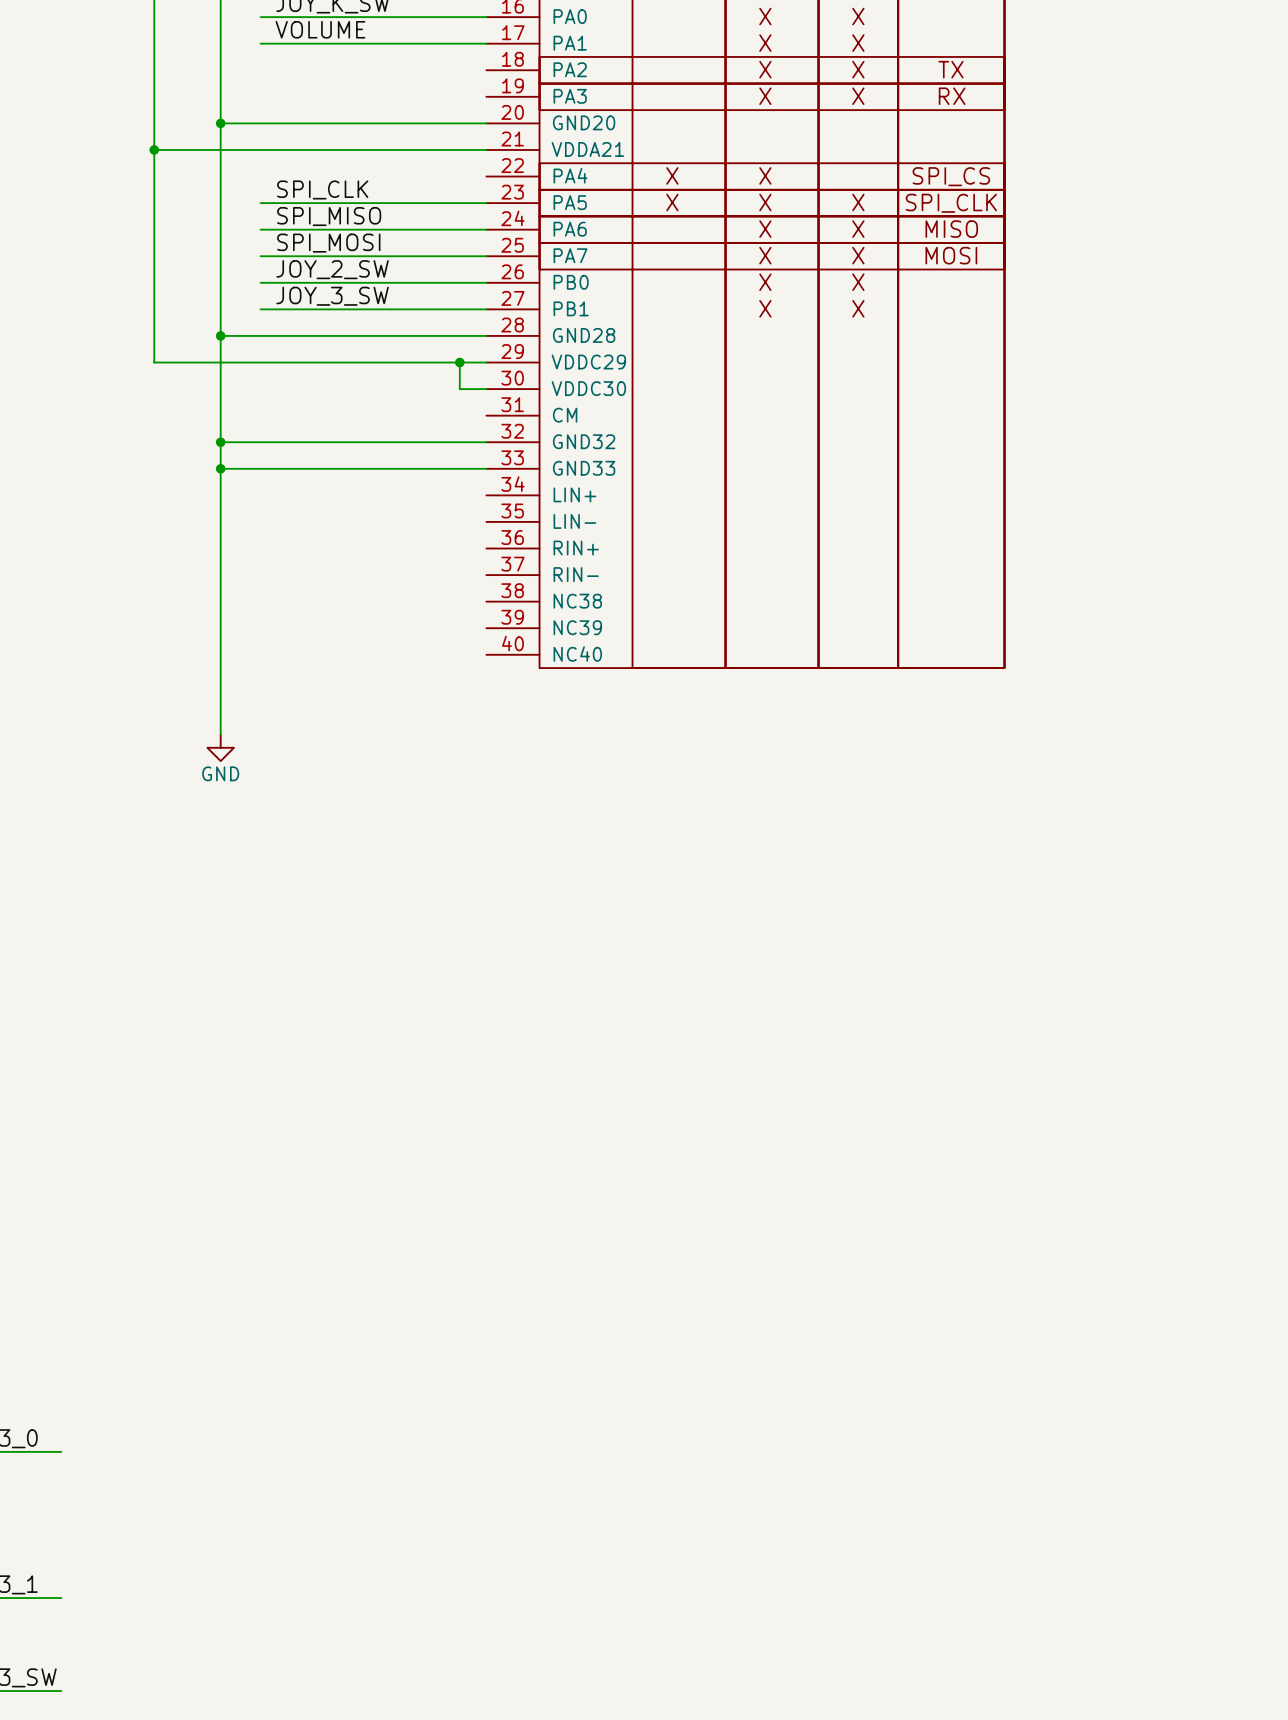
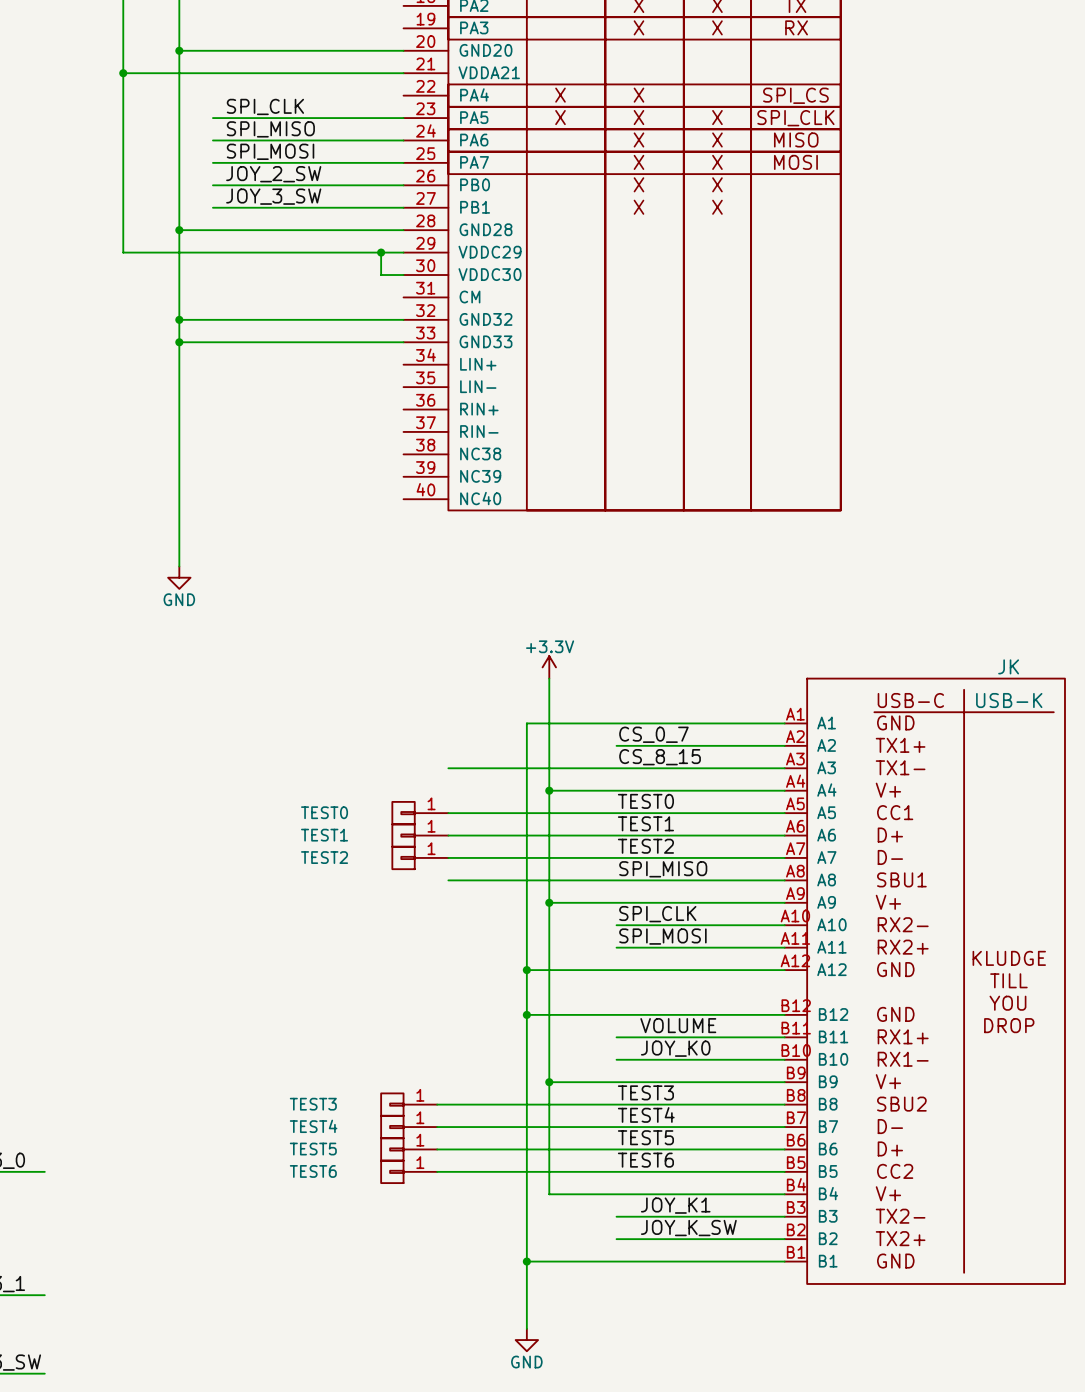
power symbol: none -> +3.3V (549, 667)
wire: none -> (549, 678) (549, 1194) (784, 1194)
wire: none -> (784, 723) (526, 723) (526, 1328)
label: none -> CS_0_7 (653, 734)
wire: none -> (616, 745) (784, 745)
label: none -> CS_8_15 (660, 757)
wire: none -> (448, 768) (784, 768)
wire: none -> (549, 790) (784, 790)
junction: none -> (549, 790)
label: none -> TEST0 (645, 801)
TEST0: none -> (420, 813)
wire: none -> (448, 813) (784, 813)
label: none -> TEST1 (645, 823)
TEST1: none -> (420, 835)
wire: none -> (448, 835) (784, 835)
label: none -> TEST2 (645, 846)
TEST2: none -> (420, 857)
wire: none -> (448, 857) (784, 857)
label: none -> SPI_MISO (663, 869)
wire: none -> (448, 880) (784, 880)
wire: none -> (549, 902) (784, 902)
junction: none -> (549, 902)
label: none -> SPI_CLK (657, 914)
wire: none -> (616, 925) (784, 925)
label: none -> SPI_MOSI (662, 936)
wire: none -> (616, 947) (784, 947)
wire: none -> (526, 970) (784, 970)
junction: none -> (526, 970)
JK: none -> USB-K (924, 981)
wire: none -> (526, 1014) (784, 1014)
junction: none -> (526, 1014)
label: none -> VOLUME (678, 1025)
wire: none -> (616, 1037) (784, 1037)
label: none -> JOY_K0 (675, 1048)
wire: none -> (616, 1059) (784, 1059)
wire: none -> (549, 1082) (784, 1082)
junction: none -> (549, 1082)
label: none -> TEST3 (645, 1092)
TEST3: none -> (409, 1104)
wire: none -> (437, 1104) (784, 1104)
label: none -> TEST4 (646, 1114)
TEST4: none -> (409, 1127)
wire: none -> (437, 1127) (784, 1127)
label: none -> TEST5 (645, 1137)
TEST5: none -> (409, 1149)
wire: none -> (437, 1149) (784, 1149)
label: none -> TEST6 (645, 1160)
TEST6: none -> (409, 1171)
wire: none -> (437, 1171) (784, 1171)
label: none -> JOY_K1 (675, 1205)
wire: none -> (616, 1216) (784, 1216)
label: none -> JOY_K_SW (688, 1228)
wire: none -> (616, 1239) (784, 1239)
wire: none -> (526, 1261) (784, 1261)
junction: none -> (526, 1261)
power symbol: none -> GND (526, 1340)

